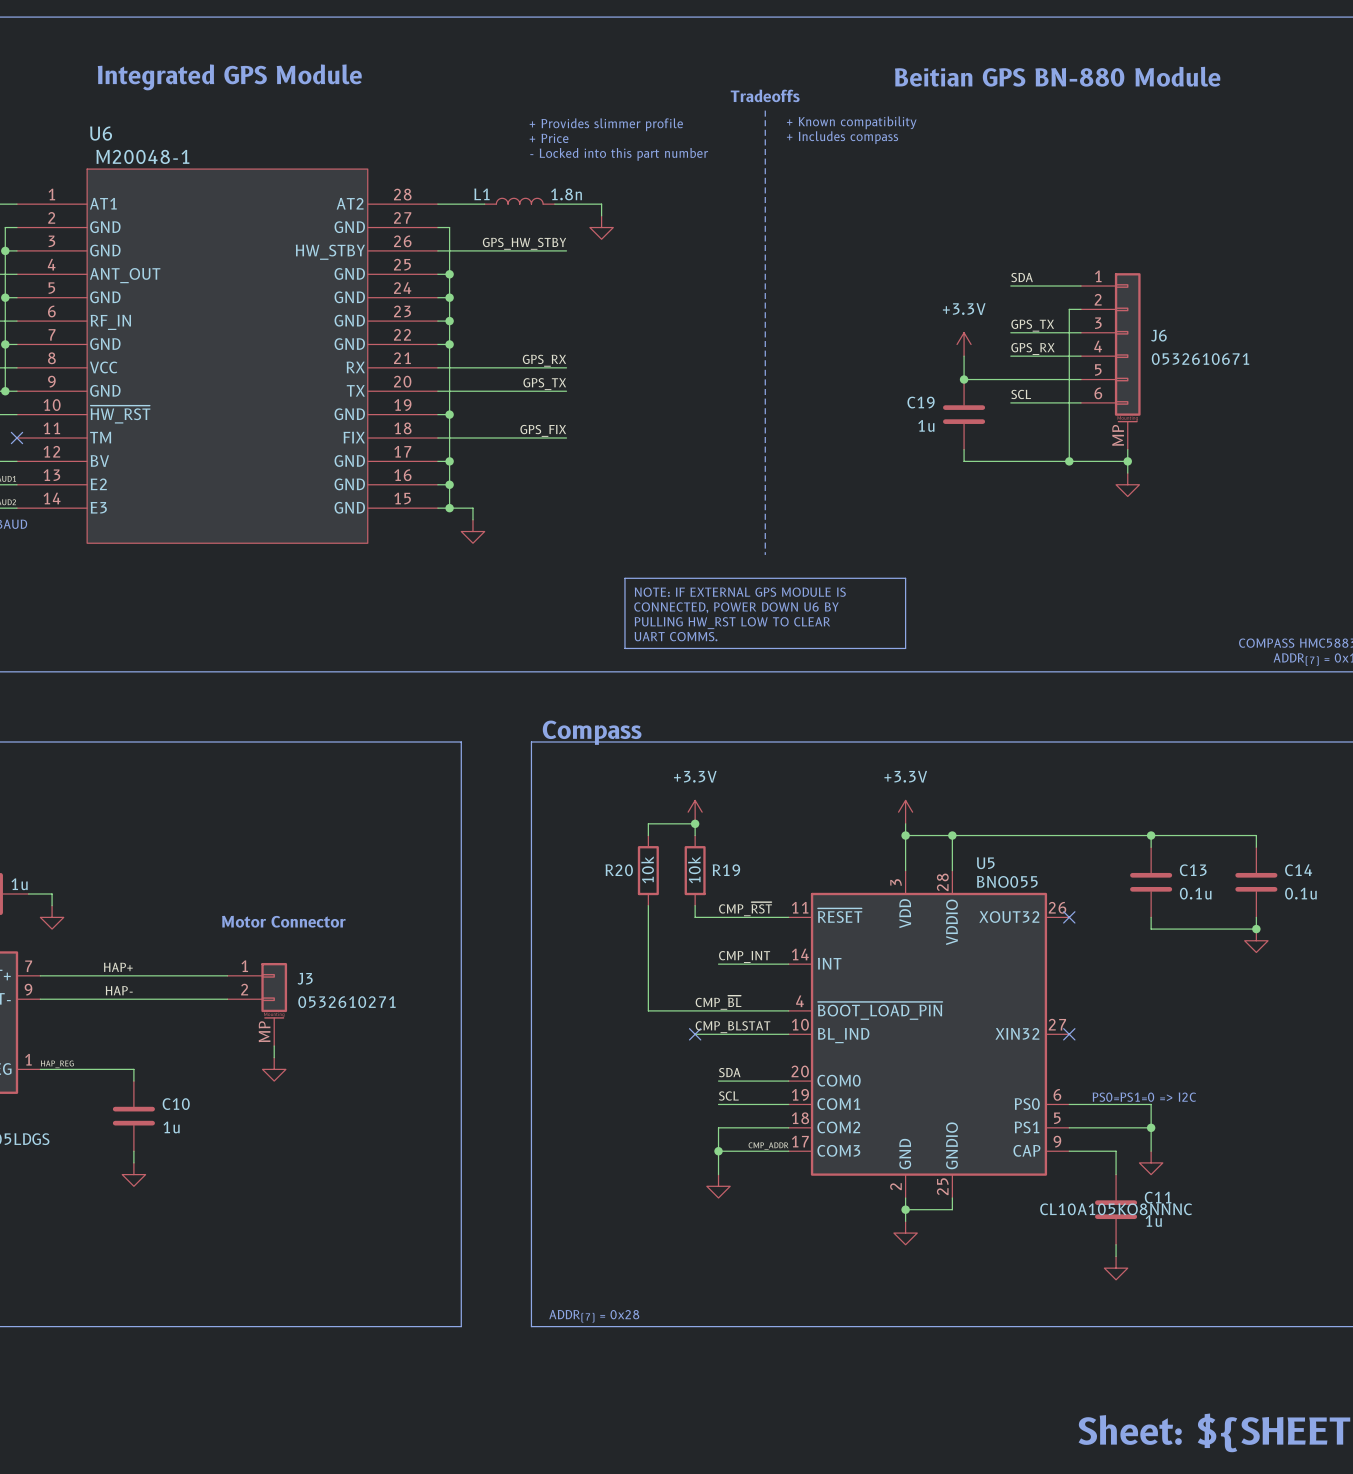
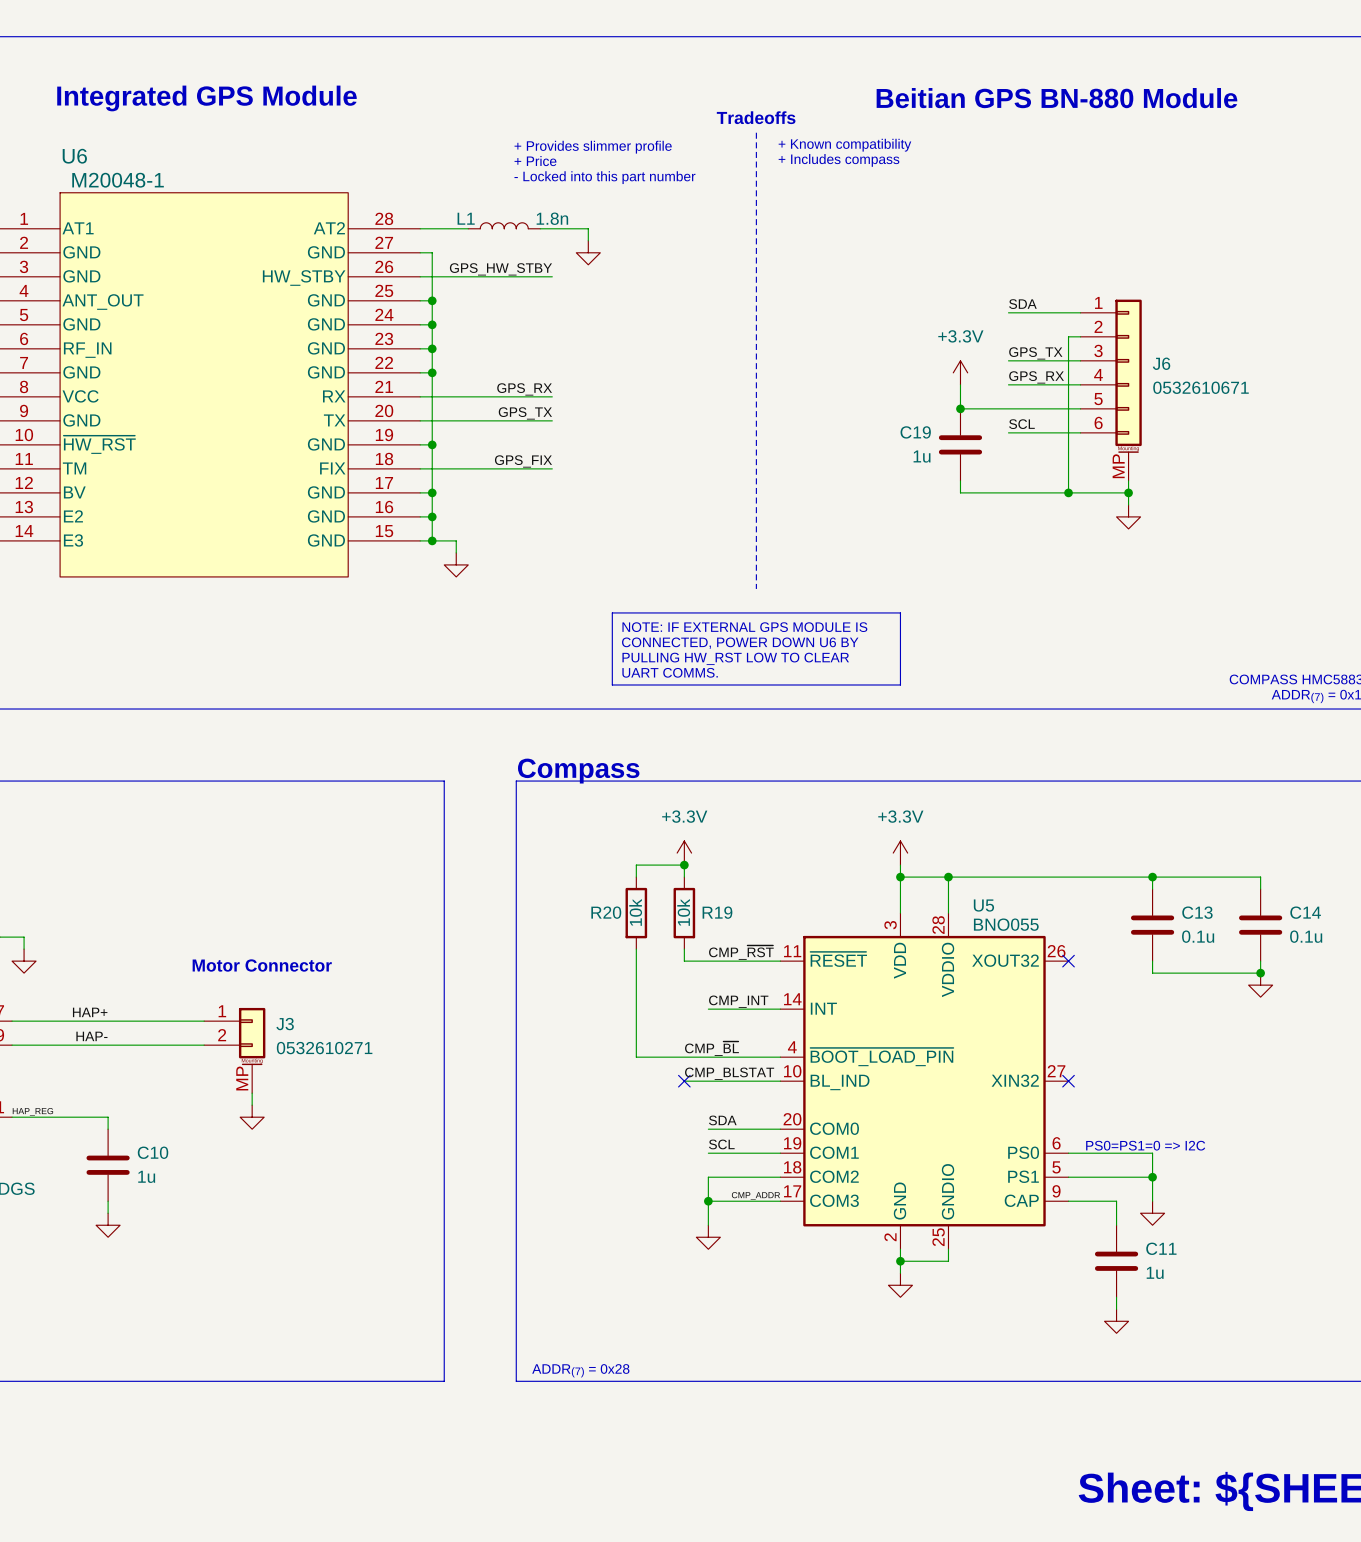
C11 text: CL10A105KO8NNNC (1116, 1209) -> none

